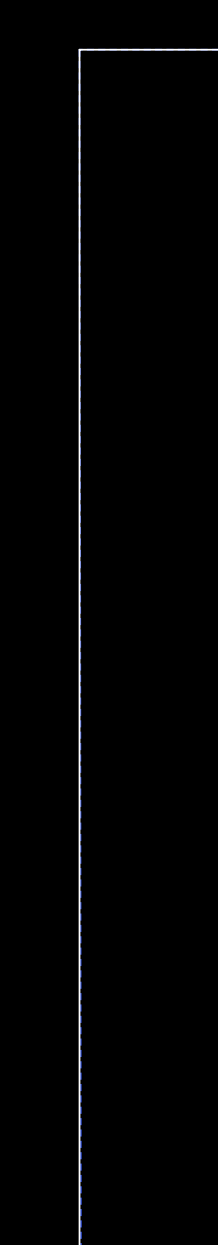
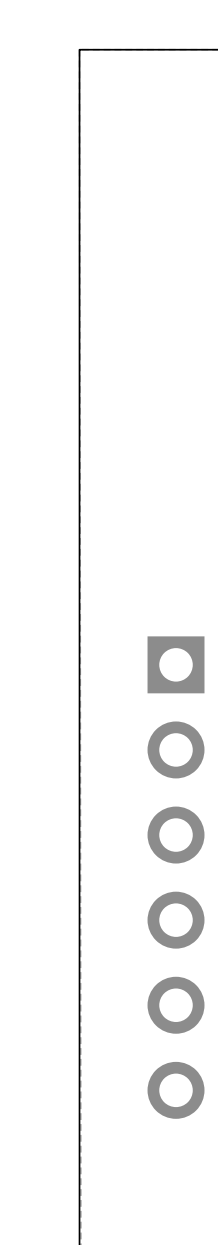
part: none -> (176, 877)

